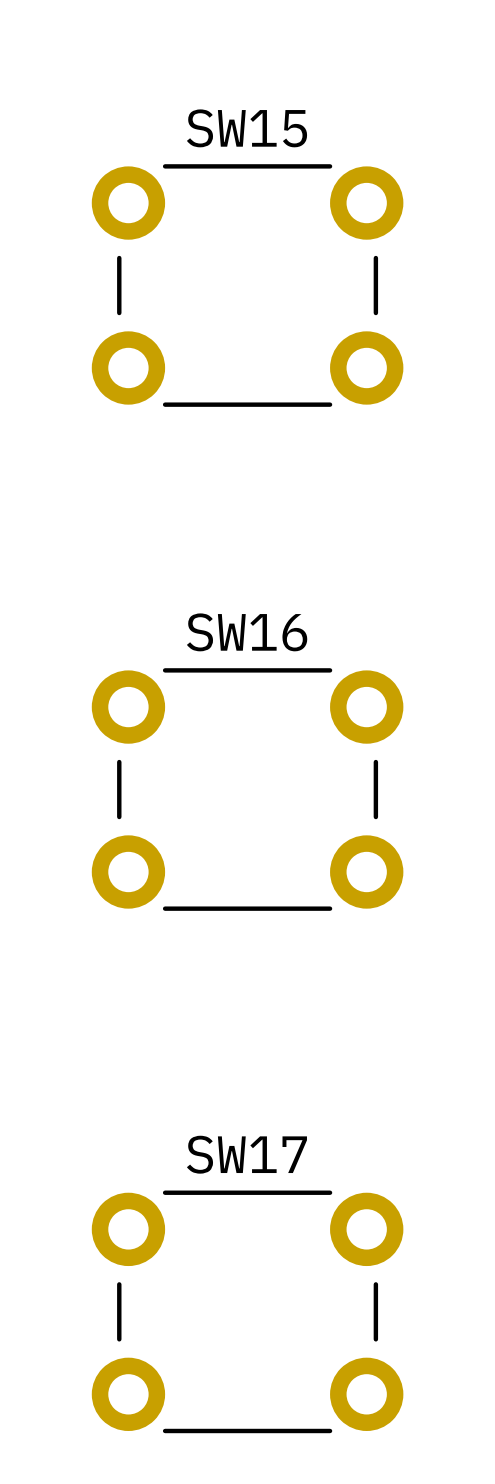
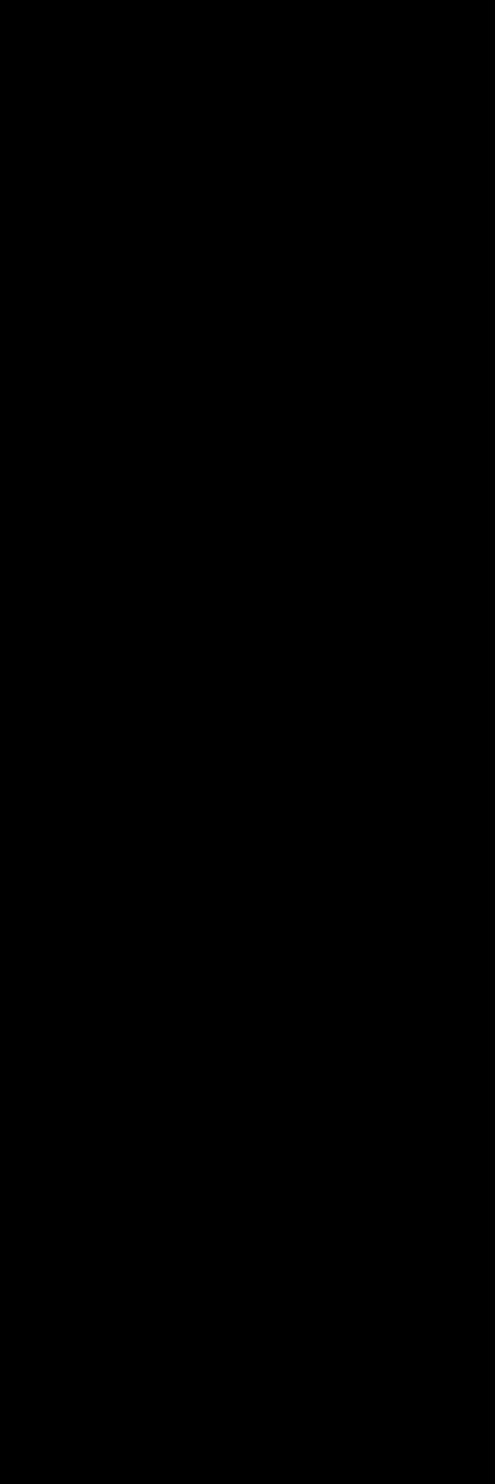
SW15: (247, 285) -> none
SW16: (247, 789) -> none
SW17: (247, 1311) -> none

